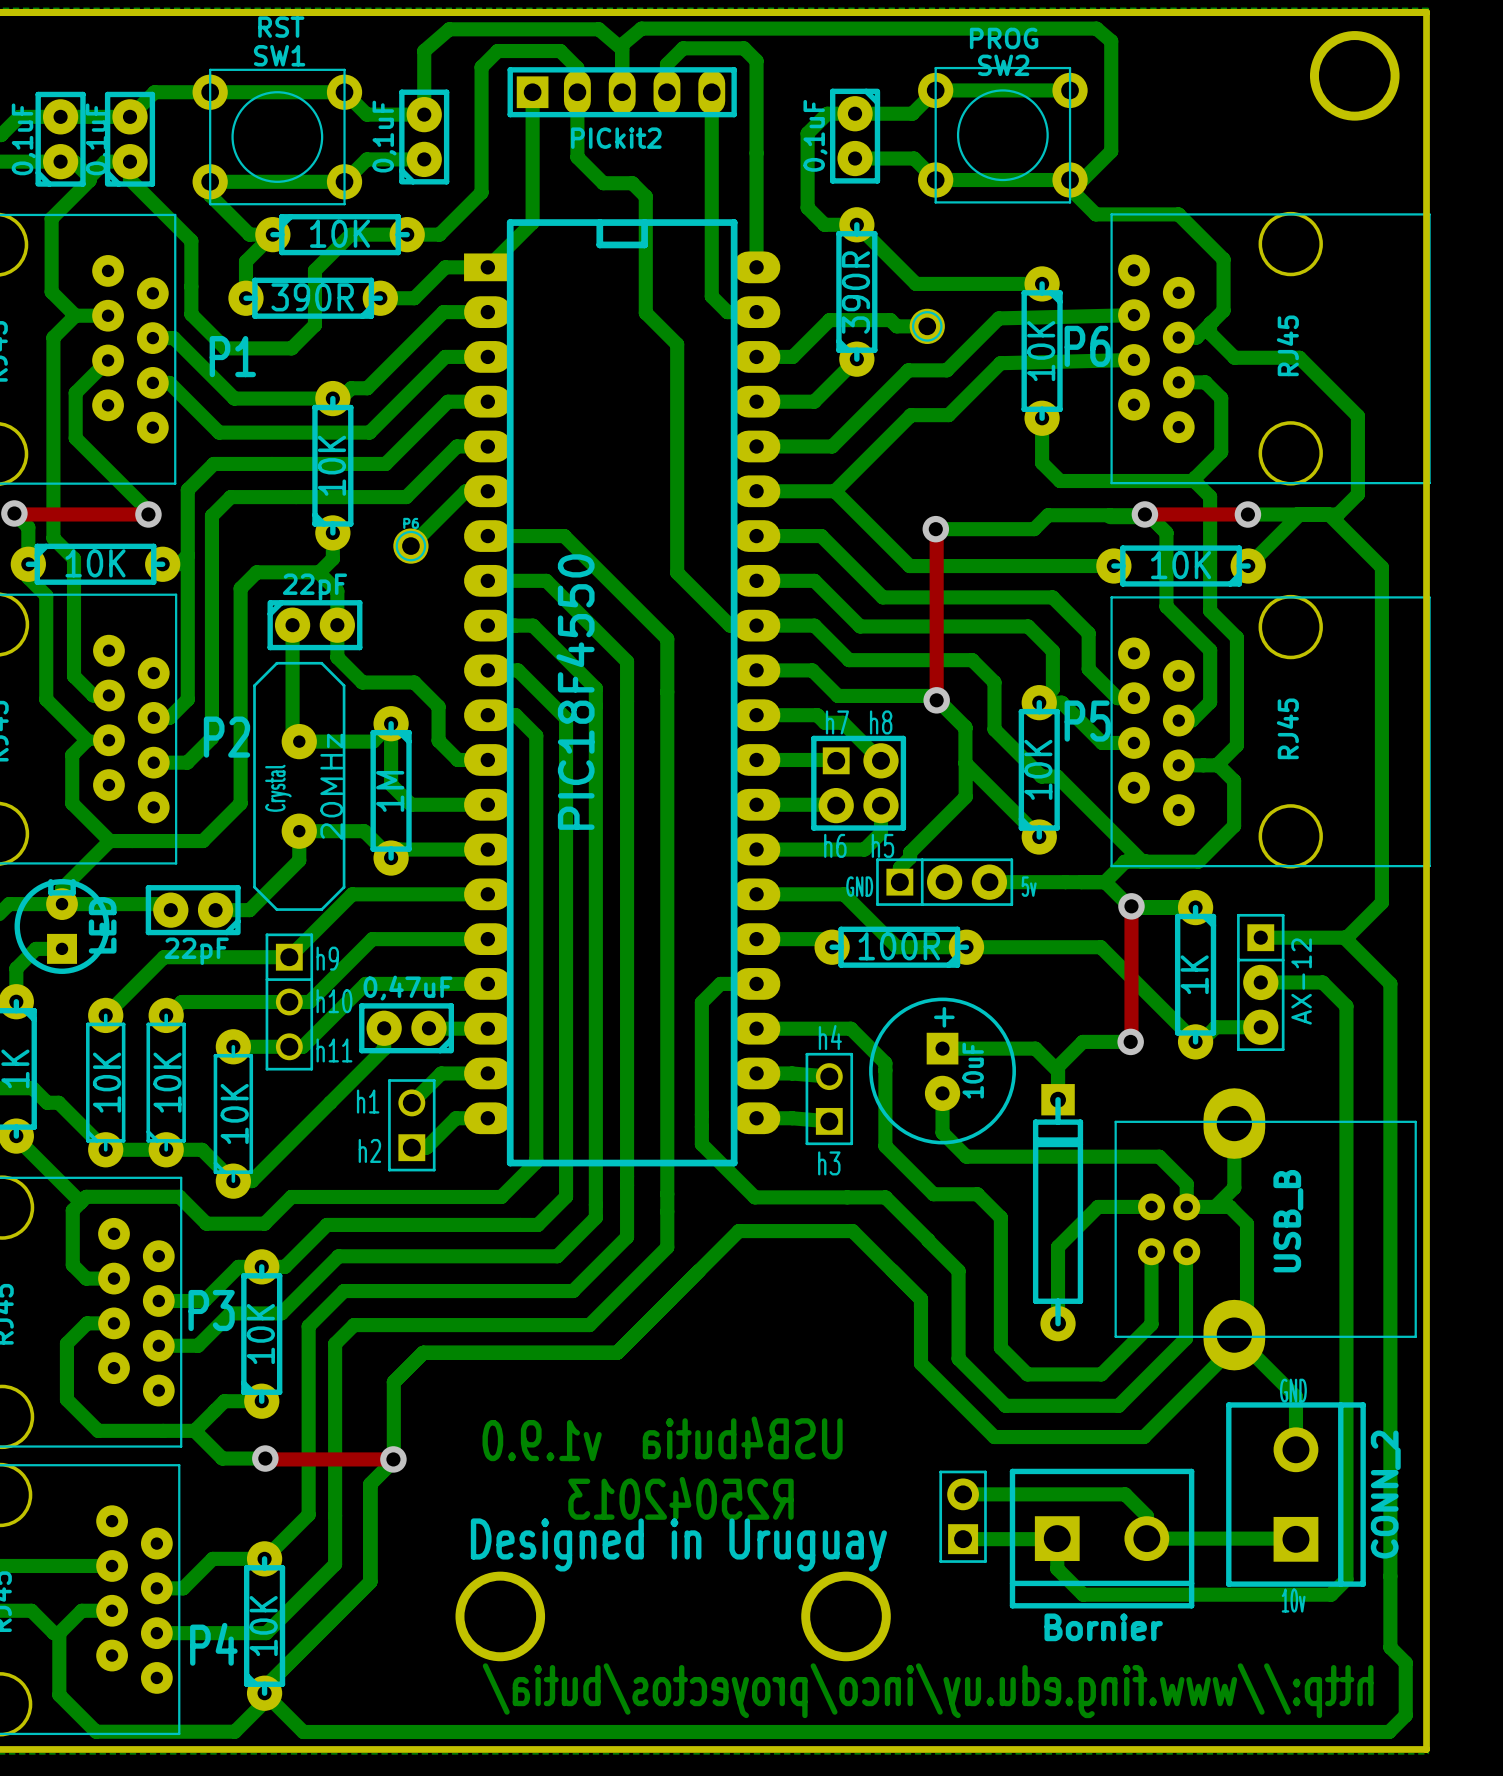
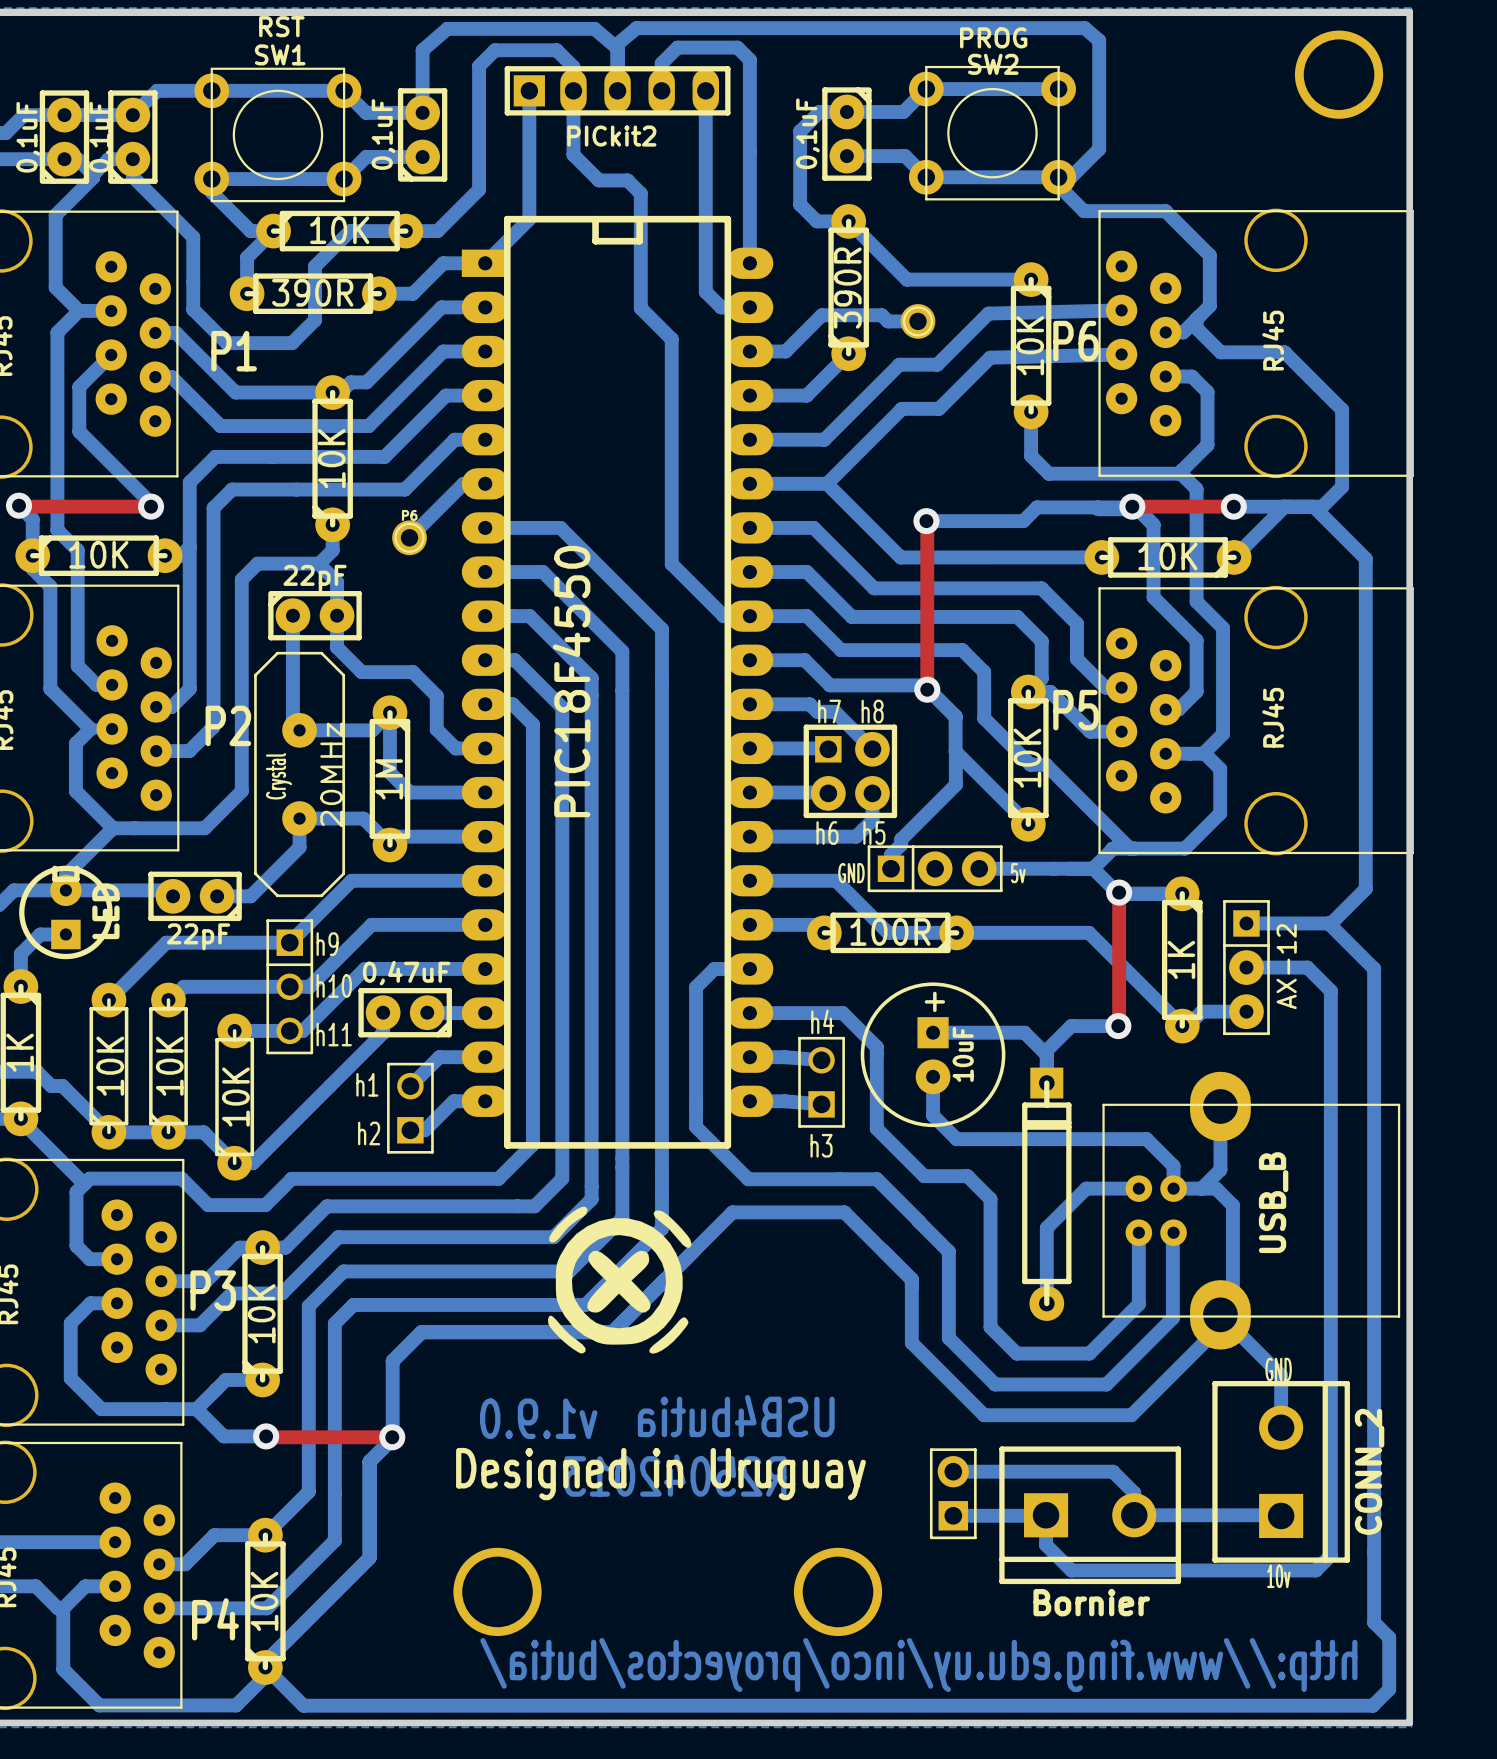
drawing: none -> [547, 1206, 692, 1354]
text position: Designed in Uruguay (678, 1544) -> Designed in Uruguay (660, 1474)

